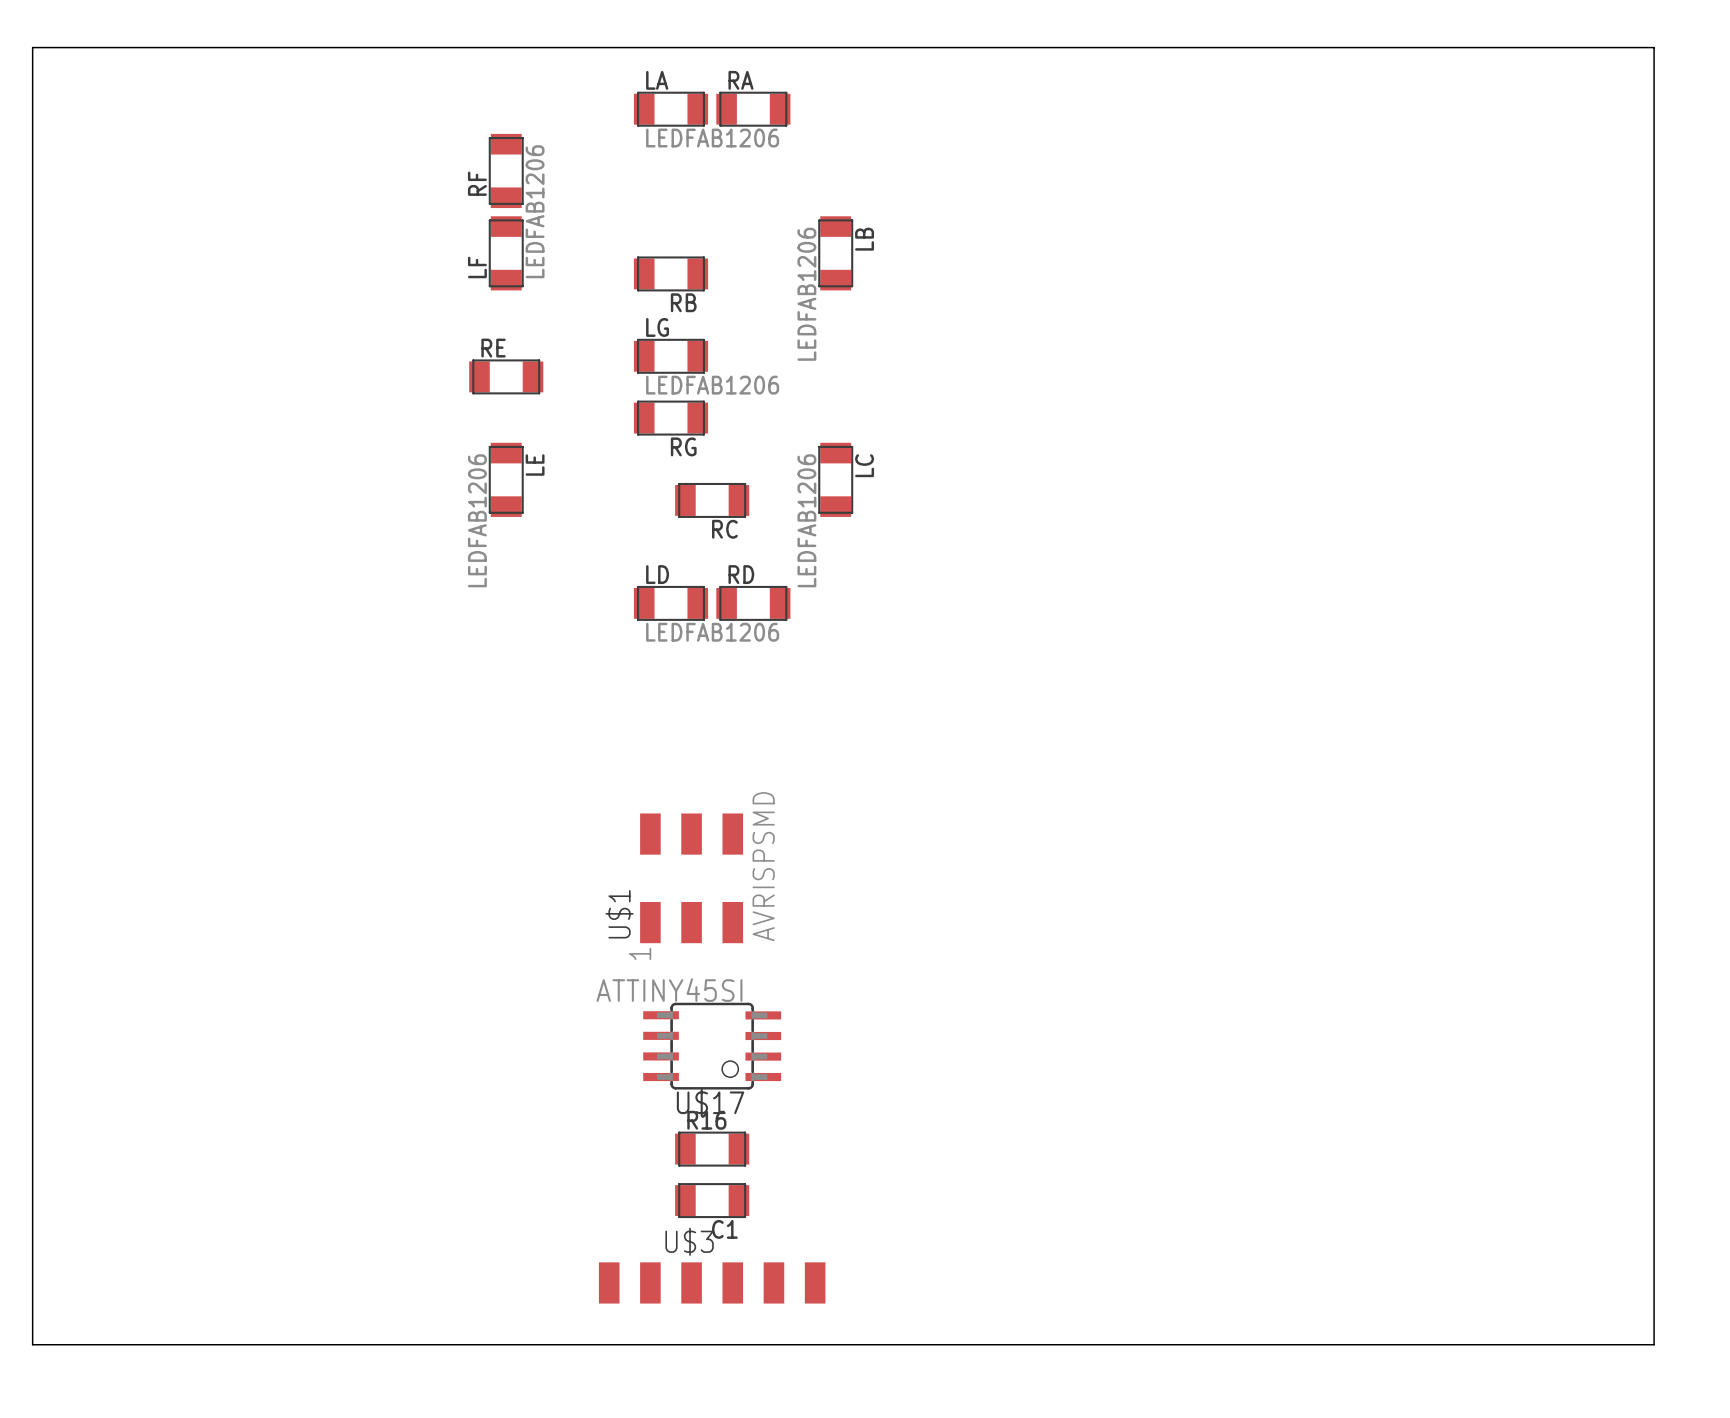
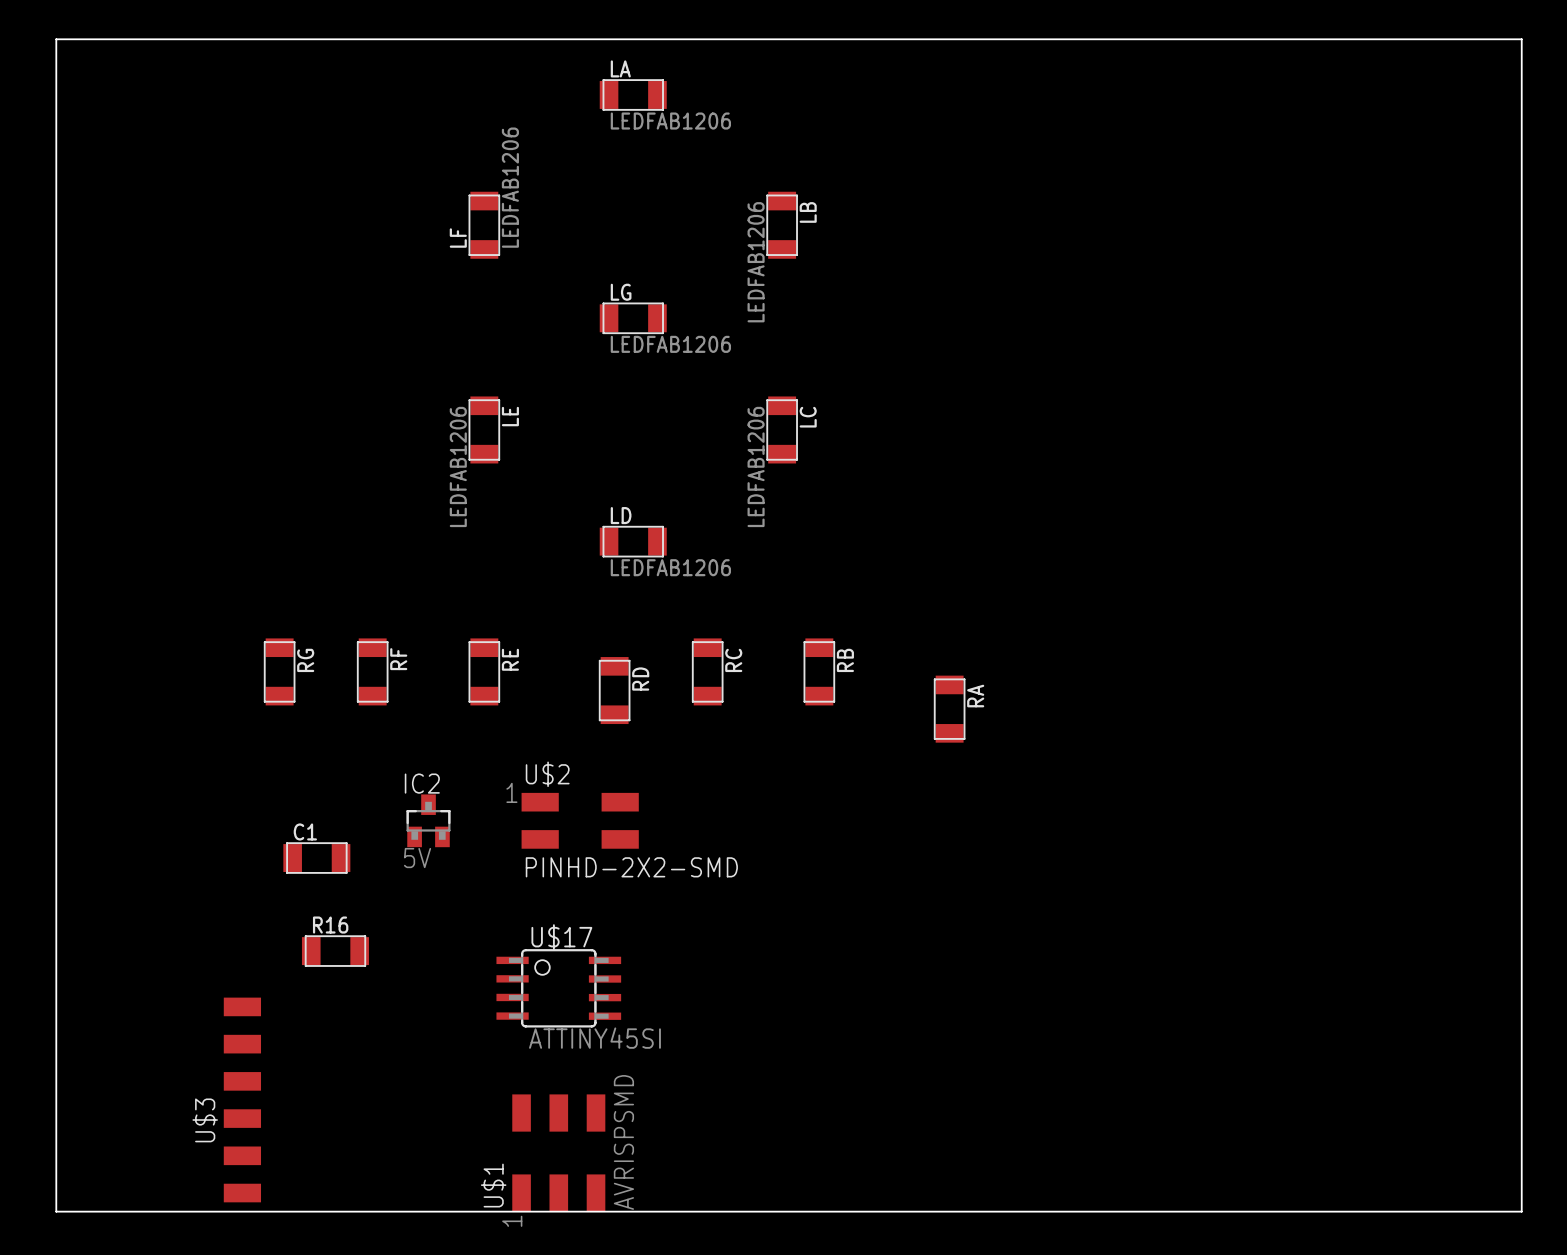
RA: (753, 109) -> none
RF: (506, 170) -> none
RB: (670, 273) -> none
RE rotation: 0° (506, 376) -> 90° clockwise (484, 671)
RE position: (506, 376) -> (484, 671)
RG: (670, 418) -> none
RC rotation: 0° (712, 500) -> 90° clockwise (707, 671)
RC position: (712, 500) -> (707, 671)
RC name position: RC (724, 529) -> RC (733, 660)
RD rotation: 0° (753, 603) -> 90° clockwise (614, 690)
RD position: (753, 603) -> (614, 690)
RG: none -> (279, 671)
RF: none -> (372, 671)
RB: none -> (819, 671)
RA: none -> (949, 709)
U$1 position: (691, 878) -> (558, 1153)
IC2: none -> 5V (428, 820)
U$2: none -> PINHD-2X2-SMD (580, 820)
U$17 rotation: 0° (712, 1046) -> 180° (558, 988)
U$17 position: (712, 1046) -> (558, 988)
R16 position: (712, 1149) -> (335, 951)
C1 position: (712, 1200) -> (316, 858)
C1 name position: C1 (724, 1229) -> C1 (305, 831)
U$3 name position: U$3 (689, 1241) -> U$3 (205, 1120)
U$3 rotation: 0° (712, 1282) -> 90° clockwise (242, 1099)
U$3 position: (712, 1282) -> (242, 1099)

